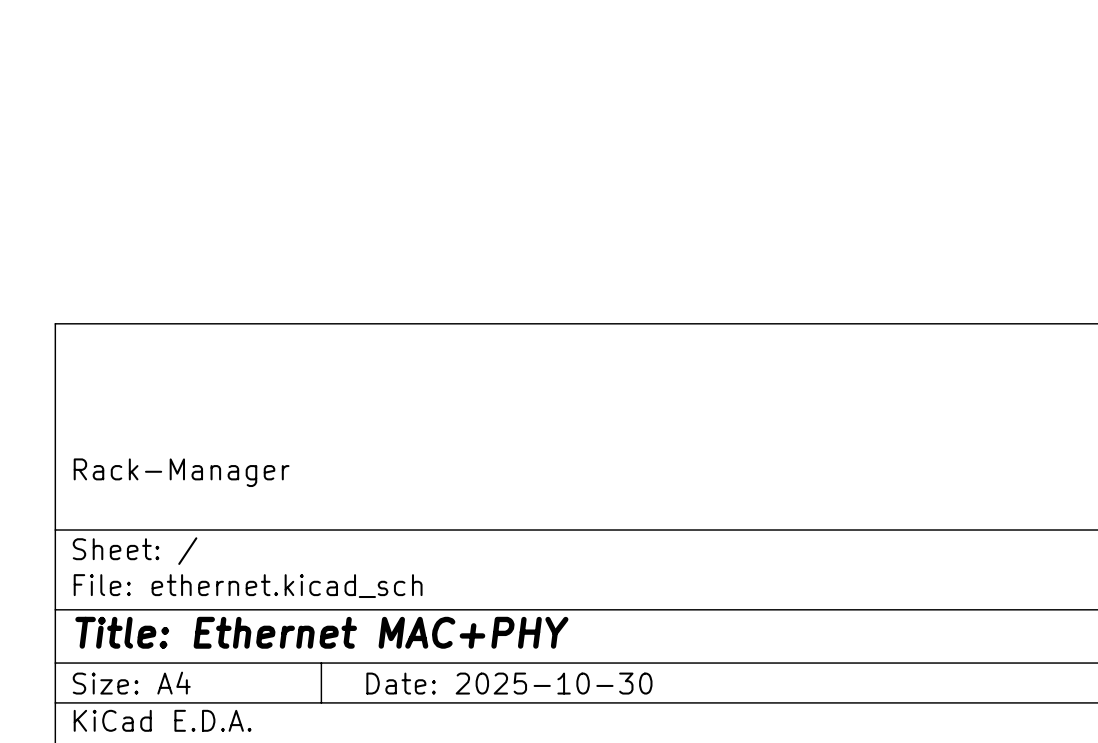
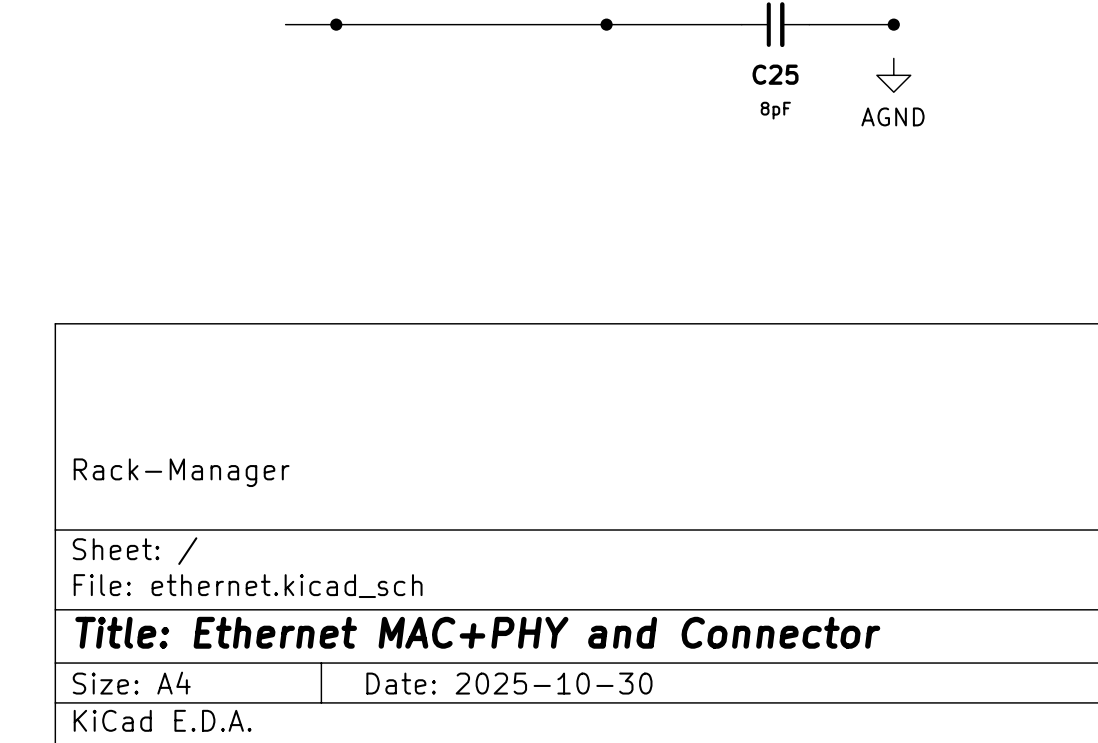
wire: none -> (285, 24) (741, 24)
junction: none -> (336, 24)
junction: none -> (606, 24)
C25: none -> 8pF (775, 24)
wire: none -> (809, 24) (893, 24)
junction: none -> (893, 24)
power symbol: none -> AGND (893, 75)
title block: Title: Ethernet MAC+PHY (321, 632) -> Title: Ethernet MAC+PHY and Connector (477, 632)

